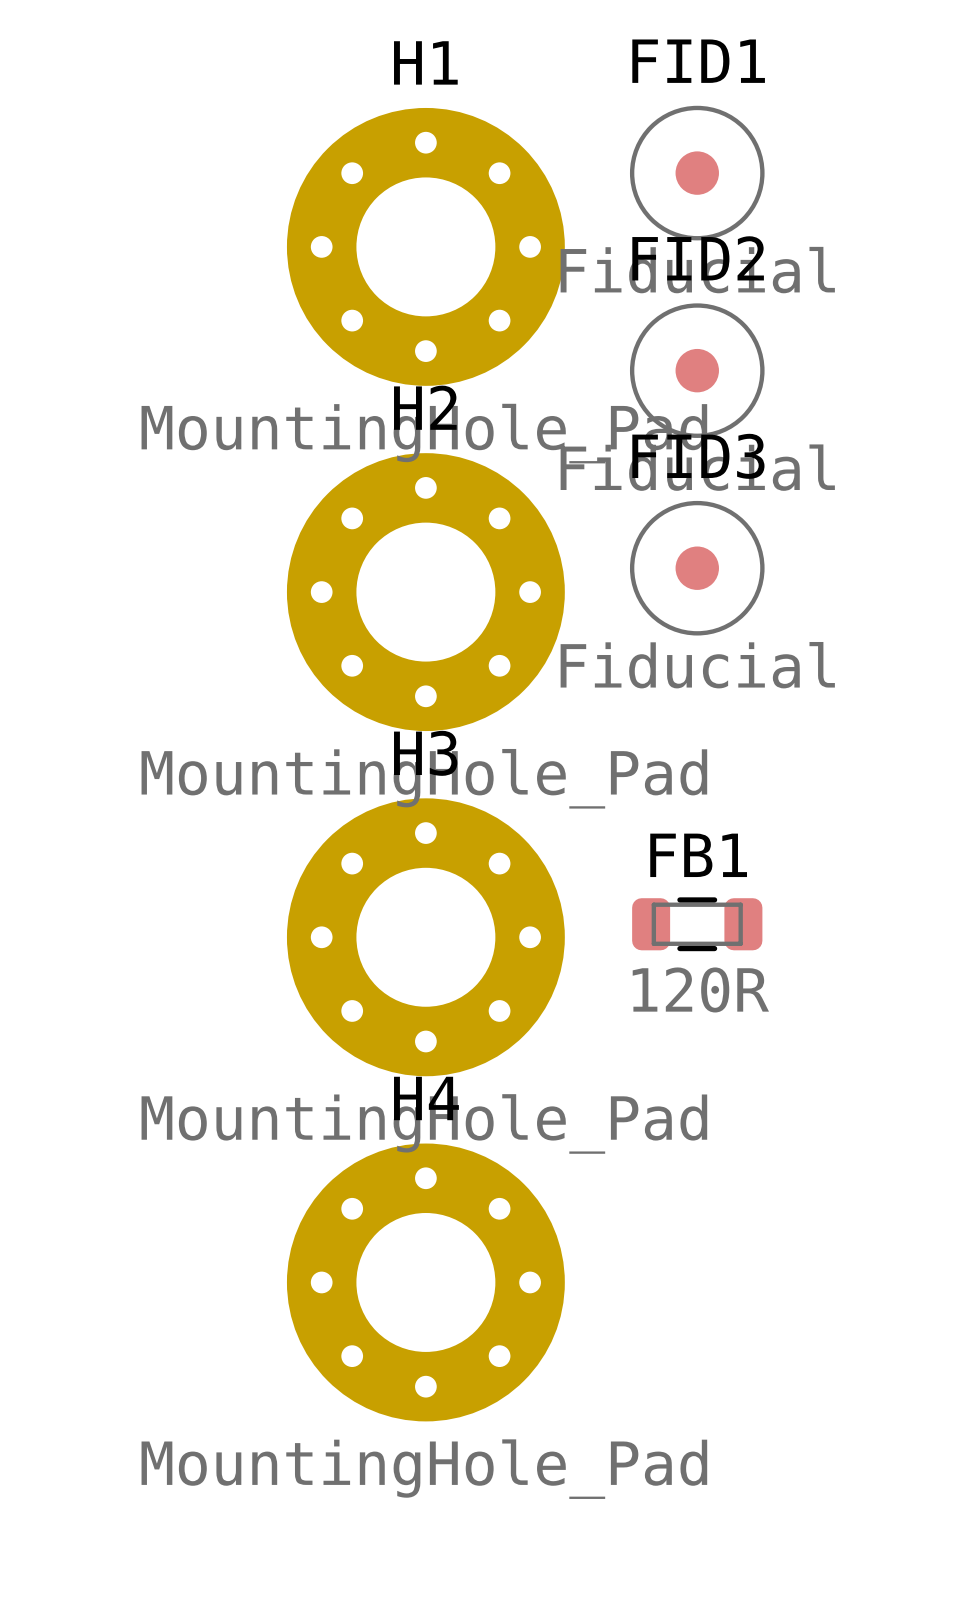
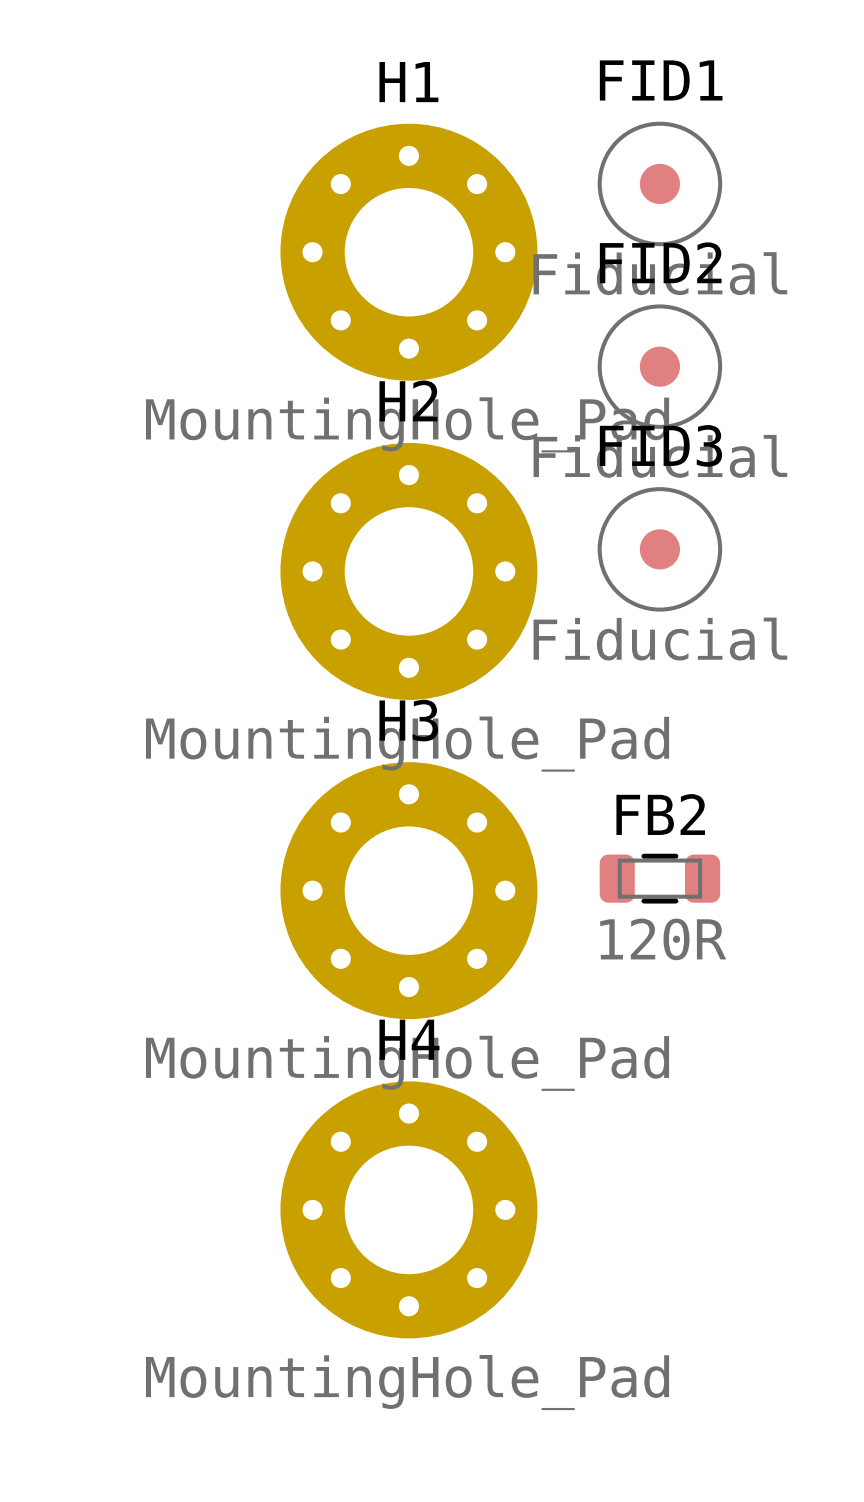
FB1 name: FB1 (698, 855) -> FB2 (660, 814)

